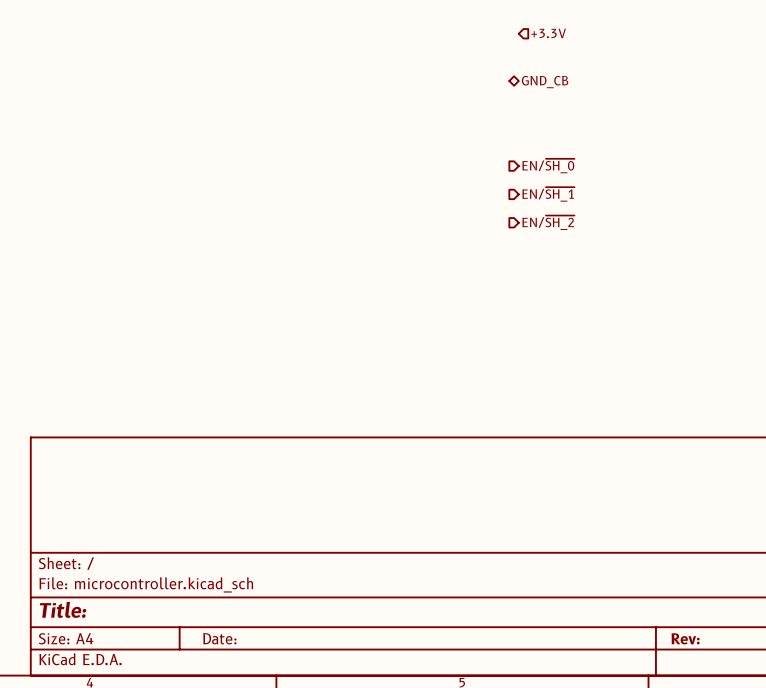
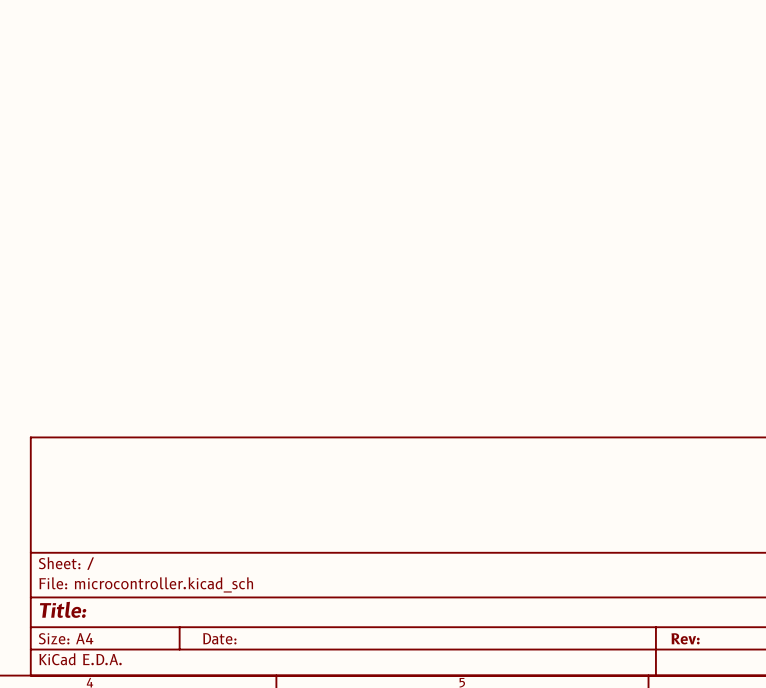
hierarchical label: +3.3V (548, 33) -> none
hierarchical label: GND_CB (545, 82) -> none
hierarchical label: EN/~{SH_0} (548, 166) -> none
hierarchical label: EN/~{SH_1} (548, 194) -> none
hierarchical label: EN/~{SH_2} (548, 222) -> none

